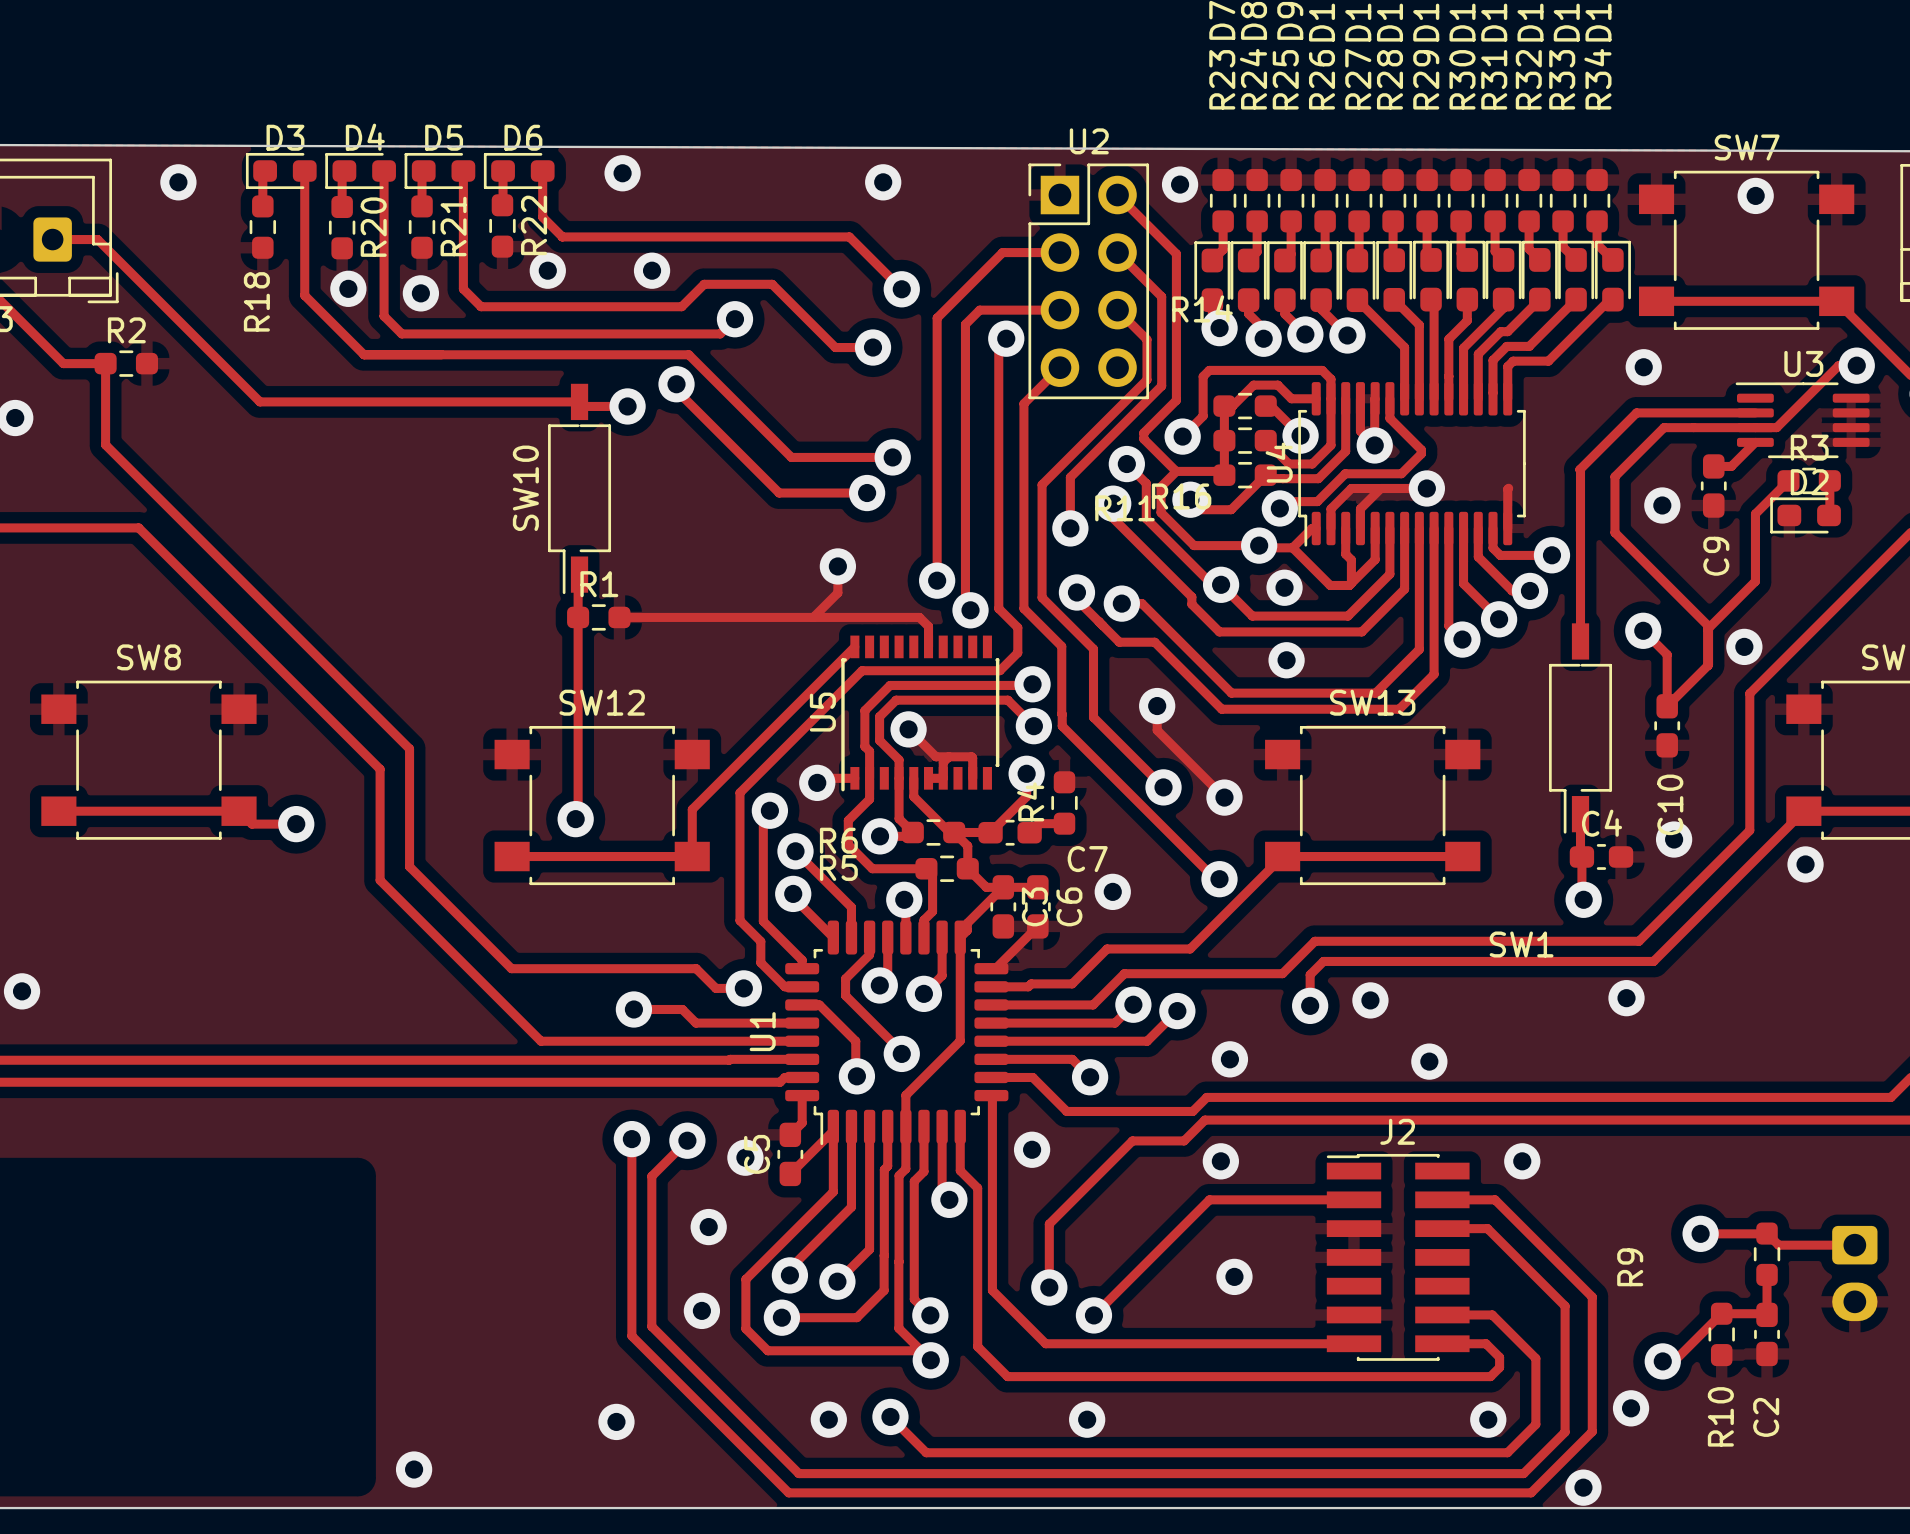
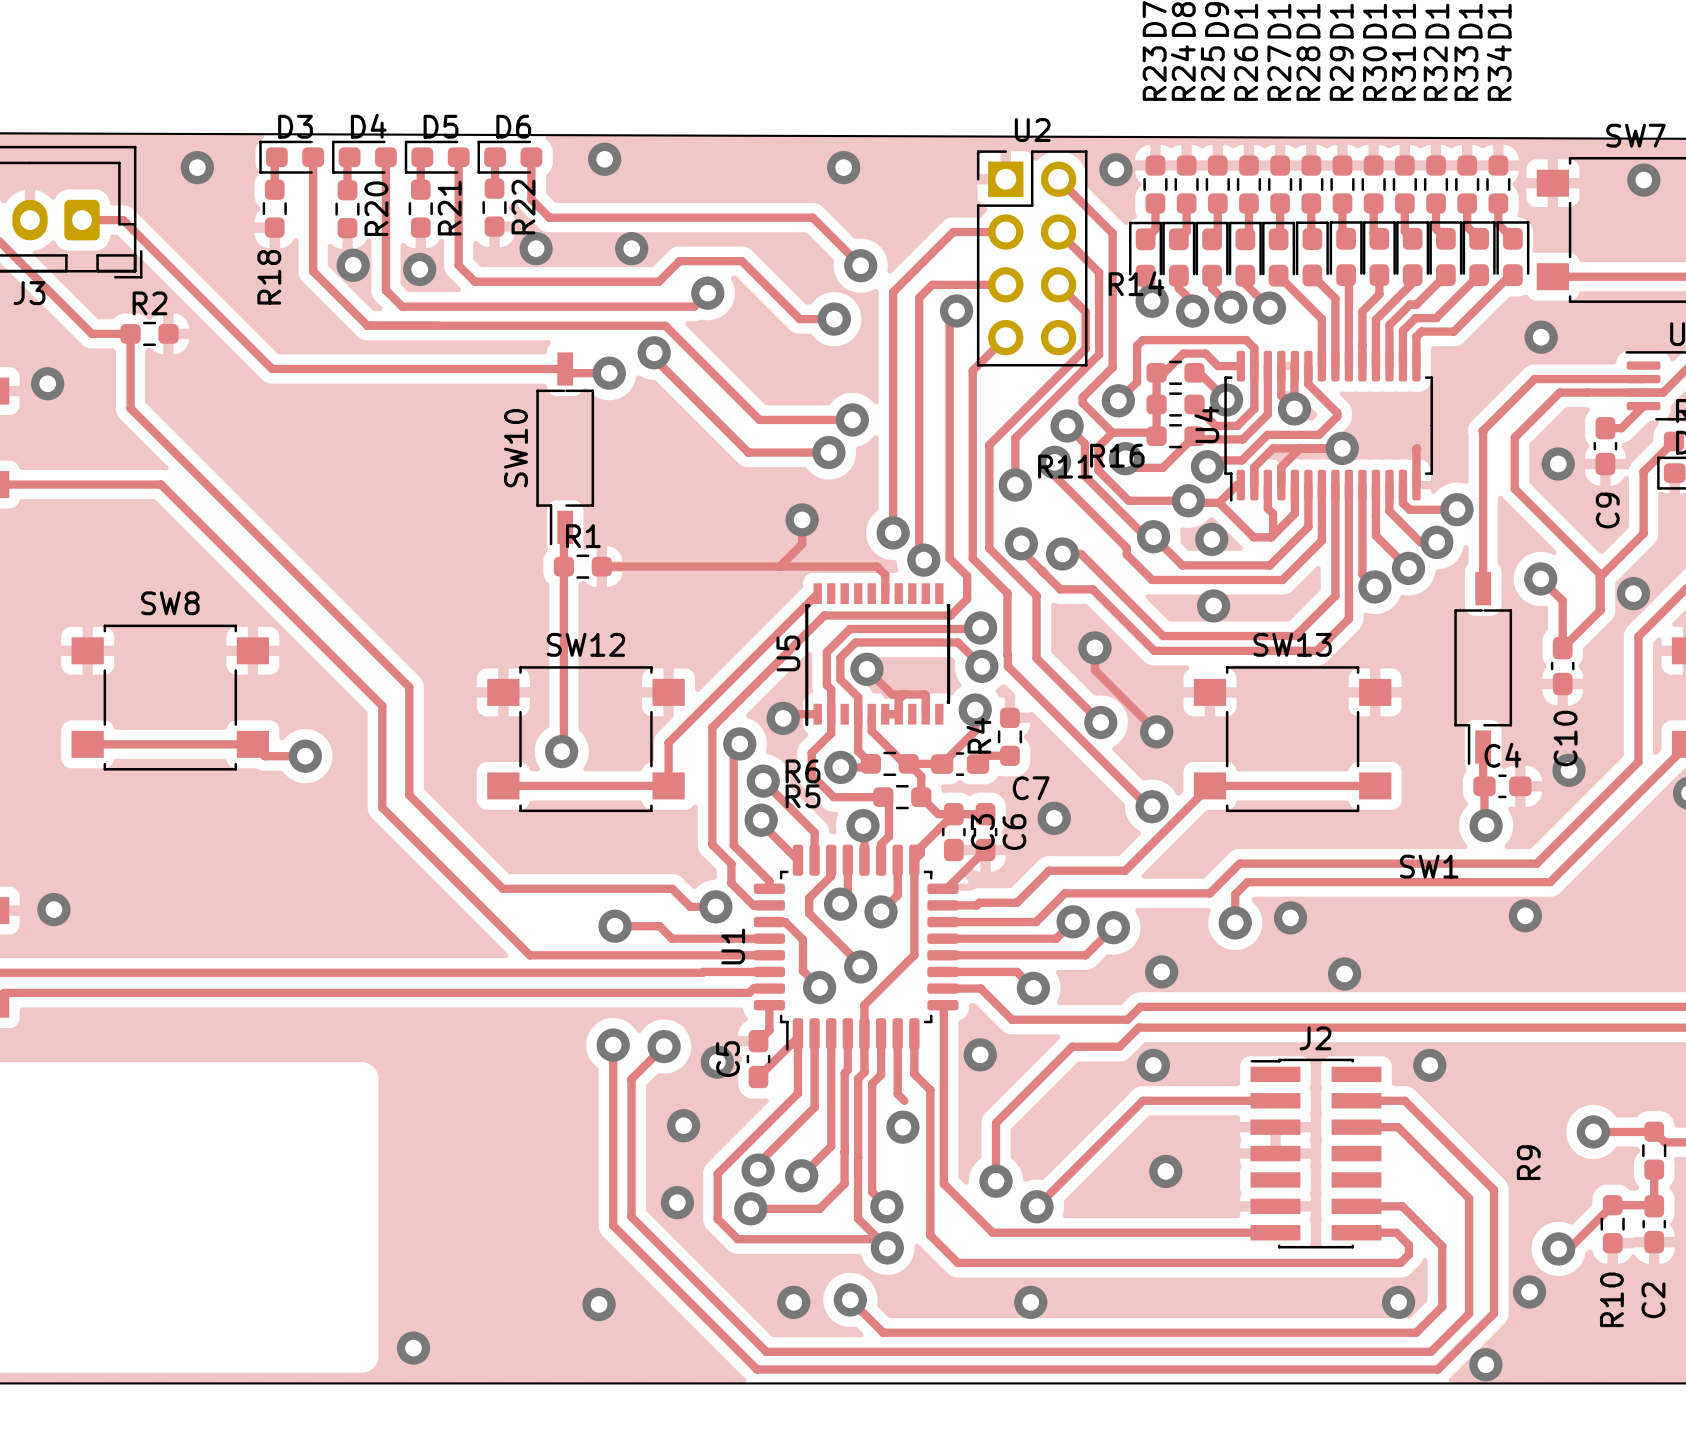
track: (838, 1024) (855, 1041) (855, 1075) -> (802, 939) (802, 970) (818, 986)
via position: (949, 1199) -> (902, 1127)

